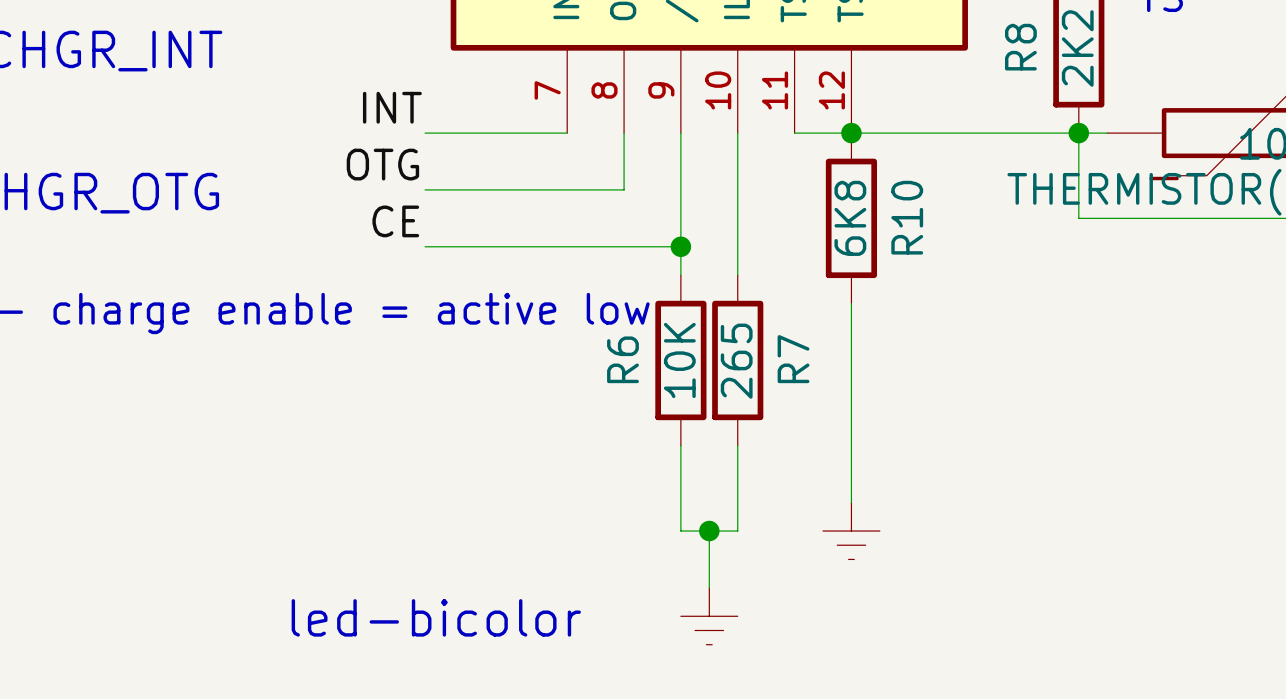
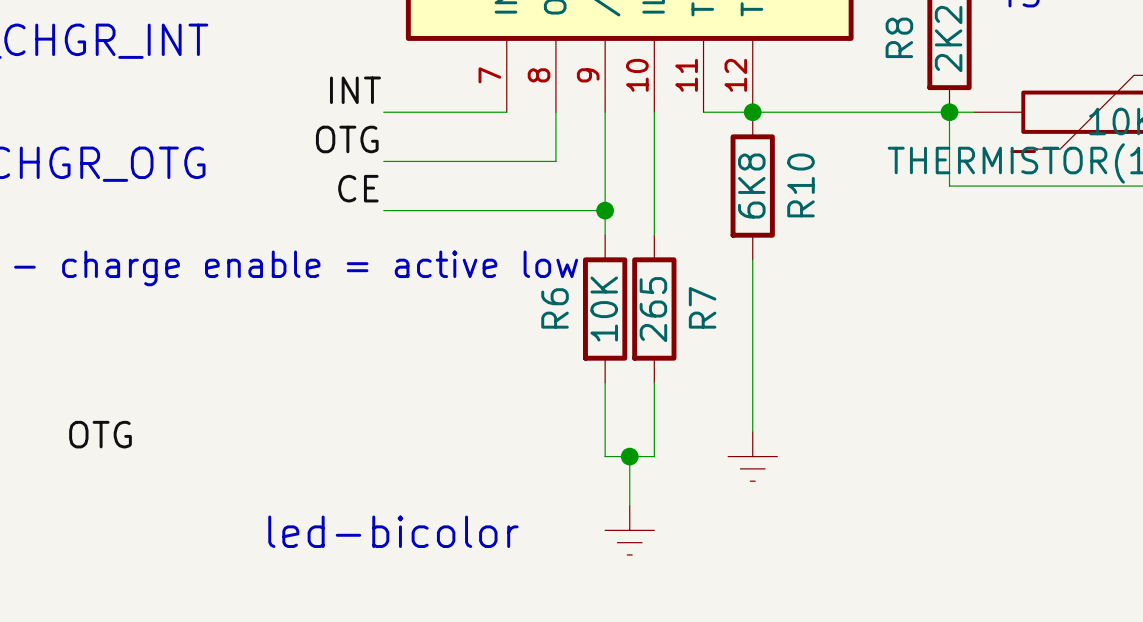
label: none -> OTG (100, 434)

